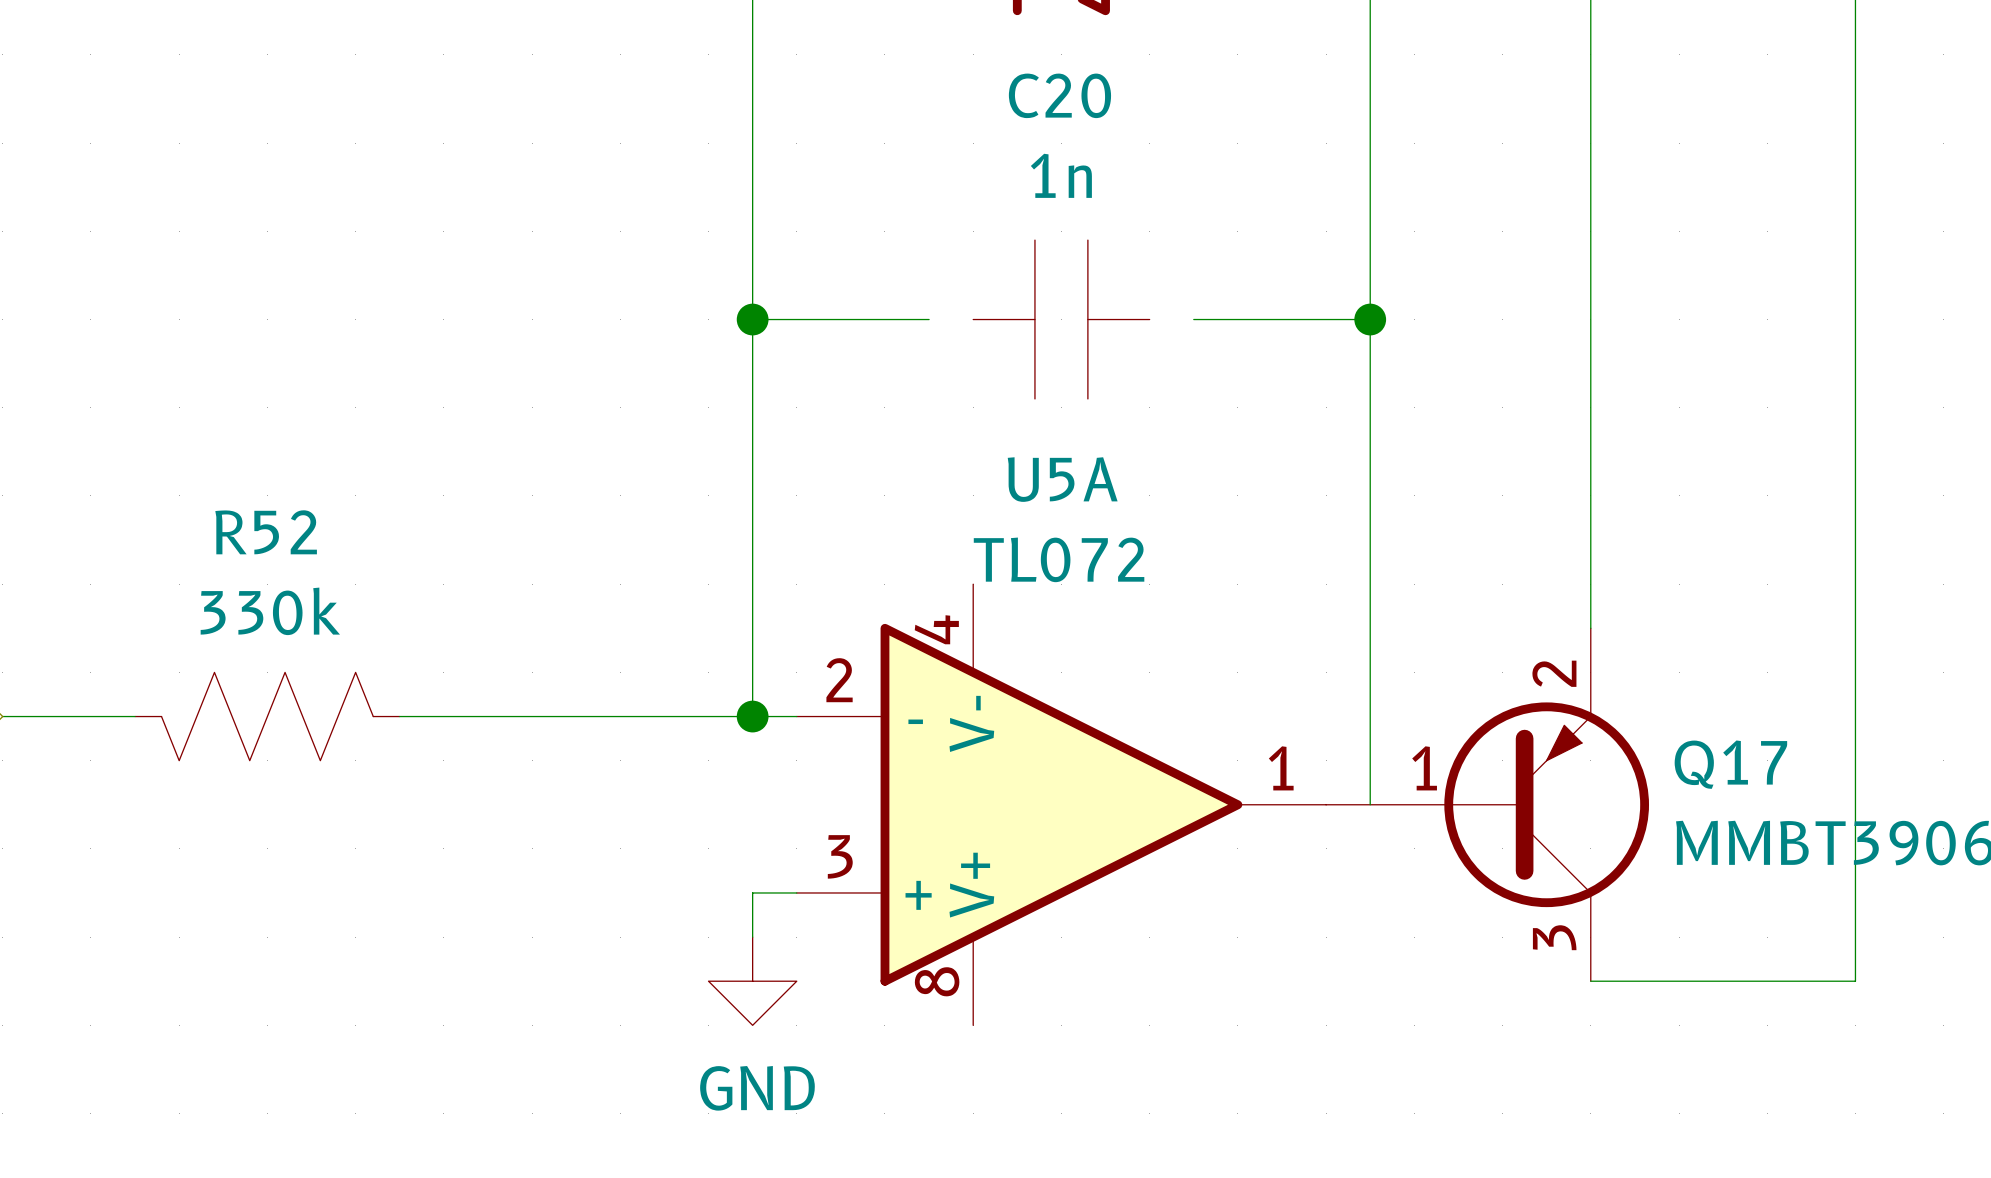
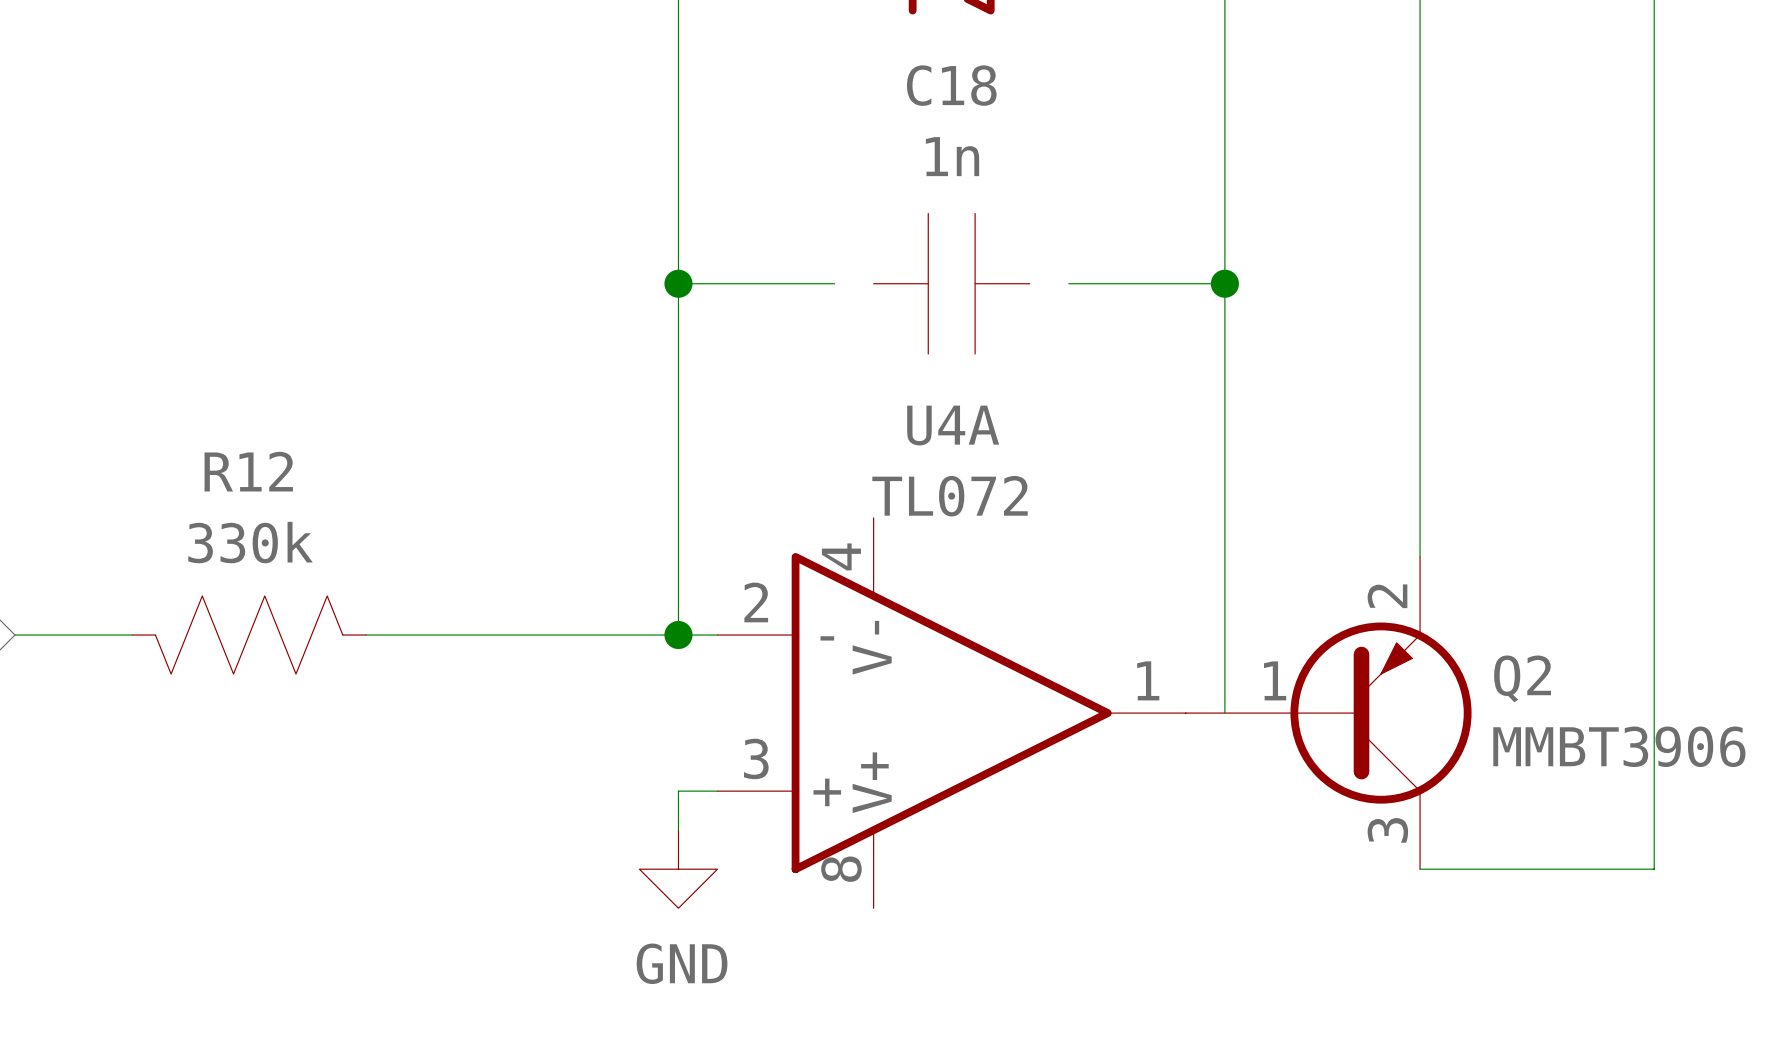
C20 name: C20 (1059, 95) -> C18 (951, 85)
U5A name: U5A (1062, 479) -> U4A (953, 425)
R52 name: R52 (266, 532) -> R12 (248, 471)
Q17 name: Q17 (1730, 764) -> Q2 (1522, 678)

